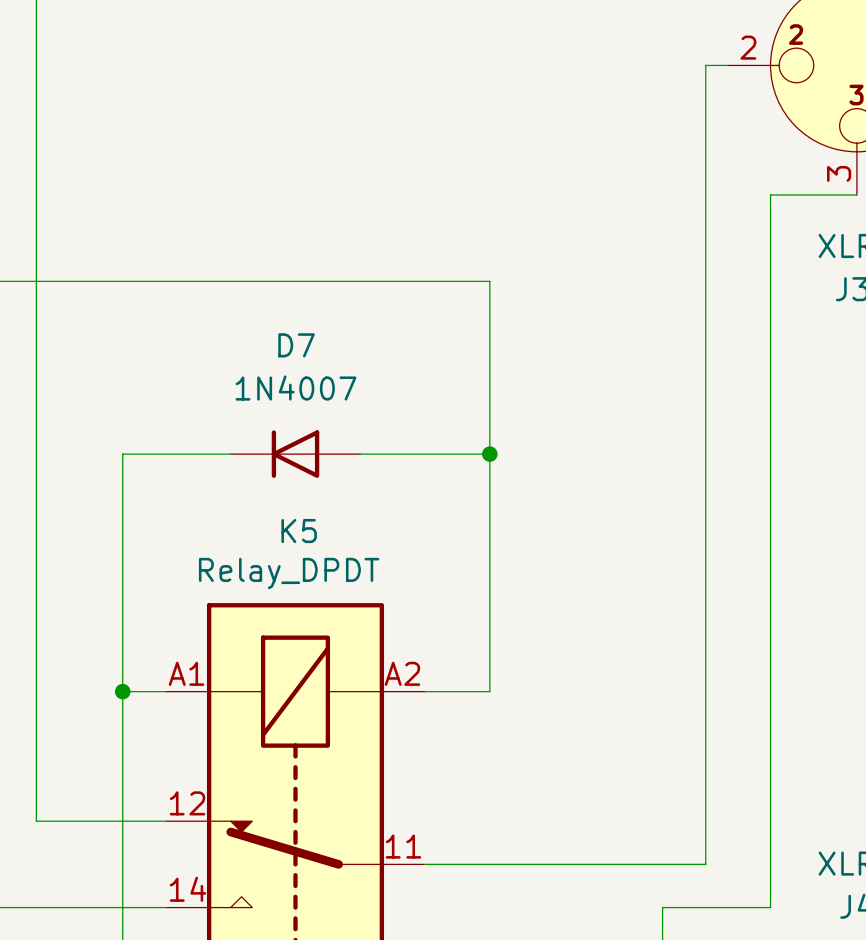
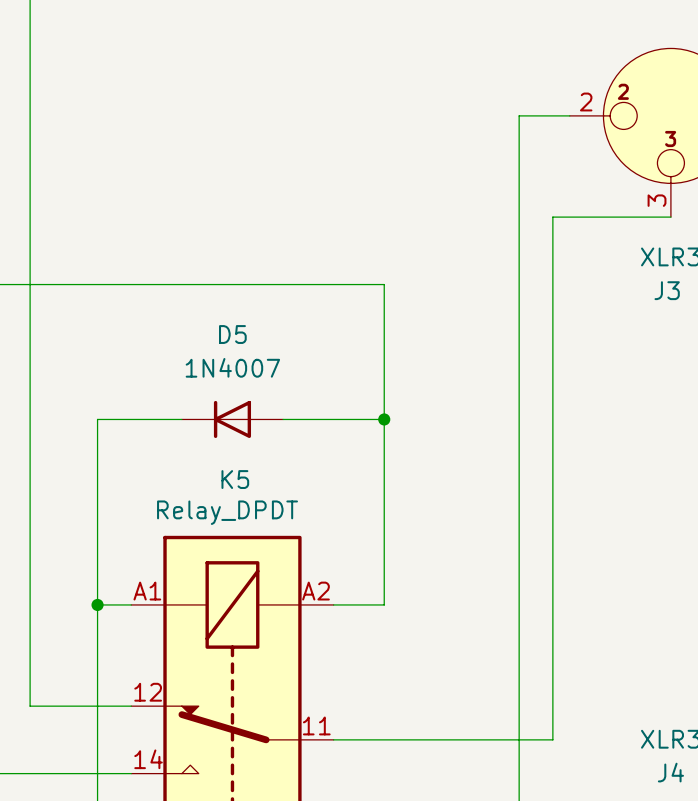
wire: (705, 65) (705, 195) -> (603, 217) (552, 217)
wire: (770, 195) (770, 907) (662, 907) -> (552, 115) (519, 115) (519, 773)
D7 name: D7 (296, 345) -> D5 (232, 334)

